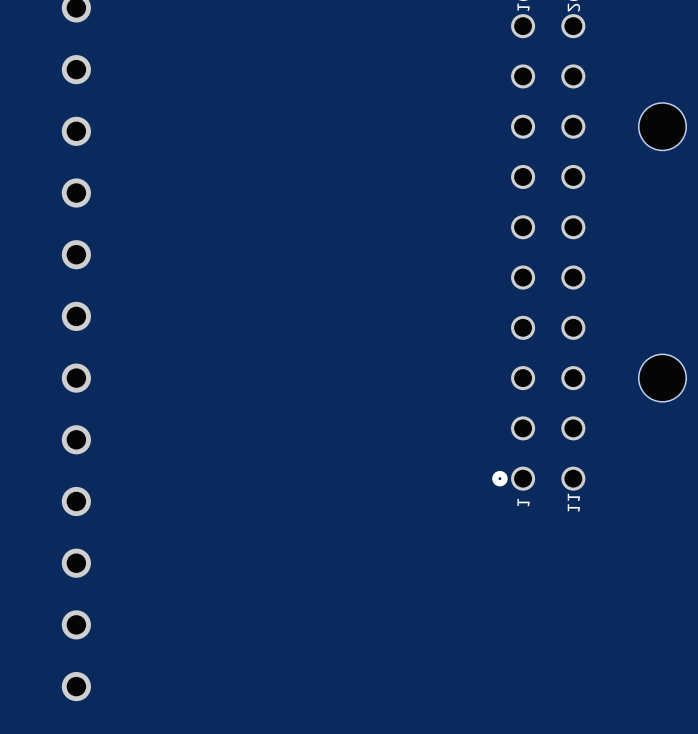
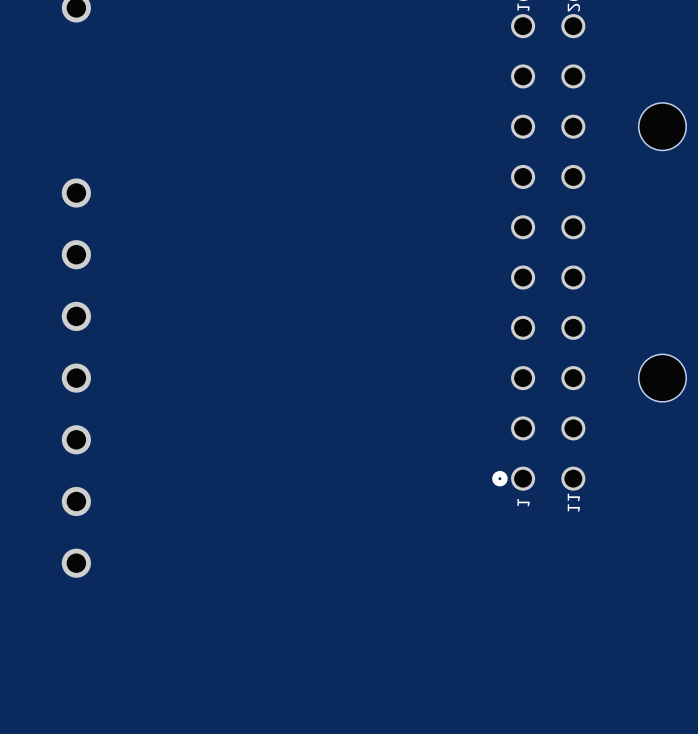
part: (76, 69) -> none
part: (76, 131) -> none
part: (76, 624) -> none
part: (76, 686) -> none

